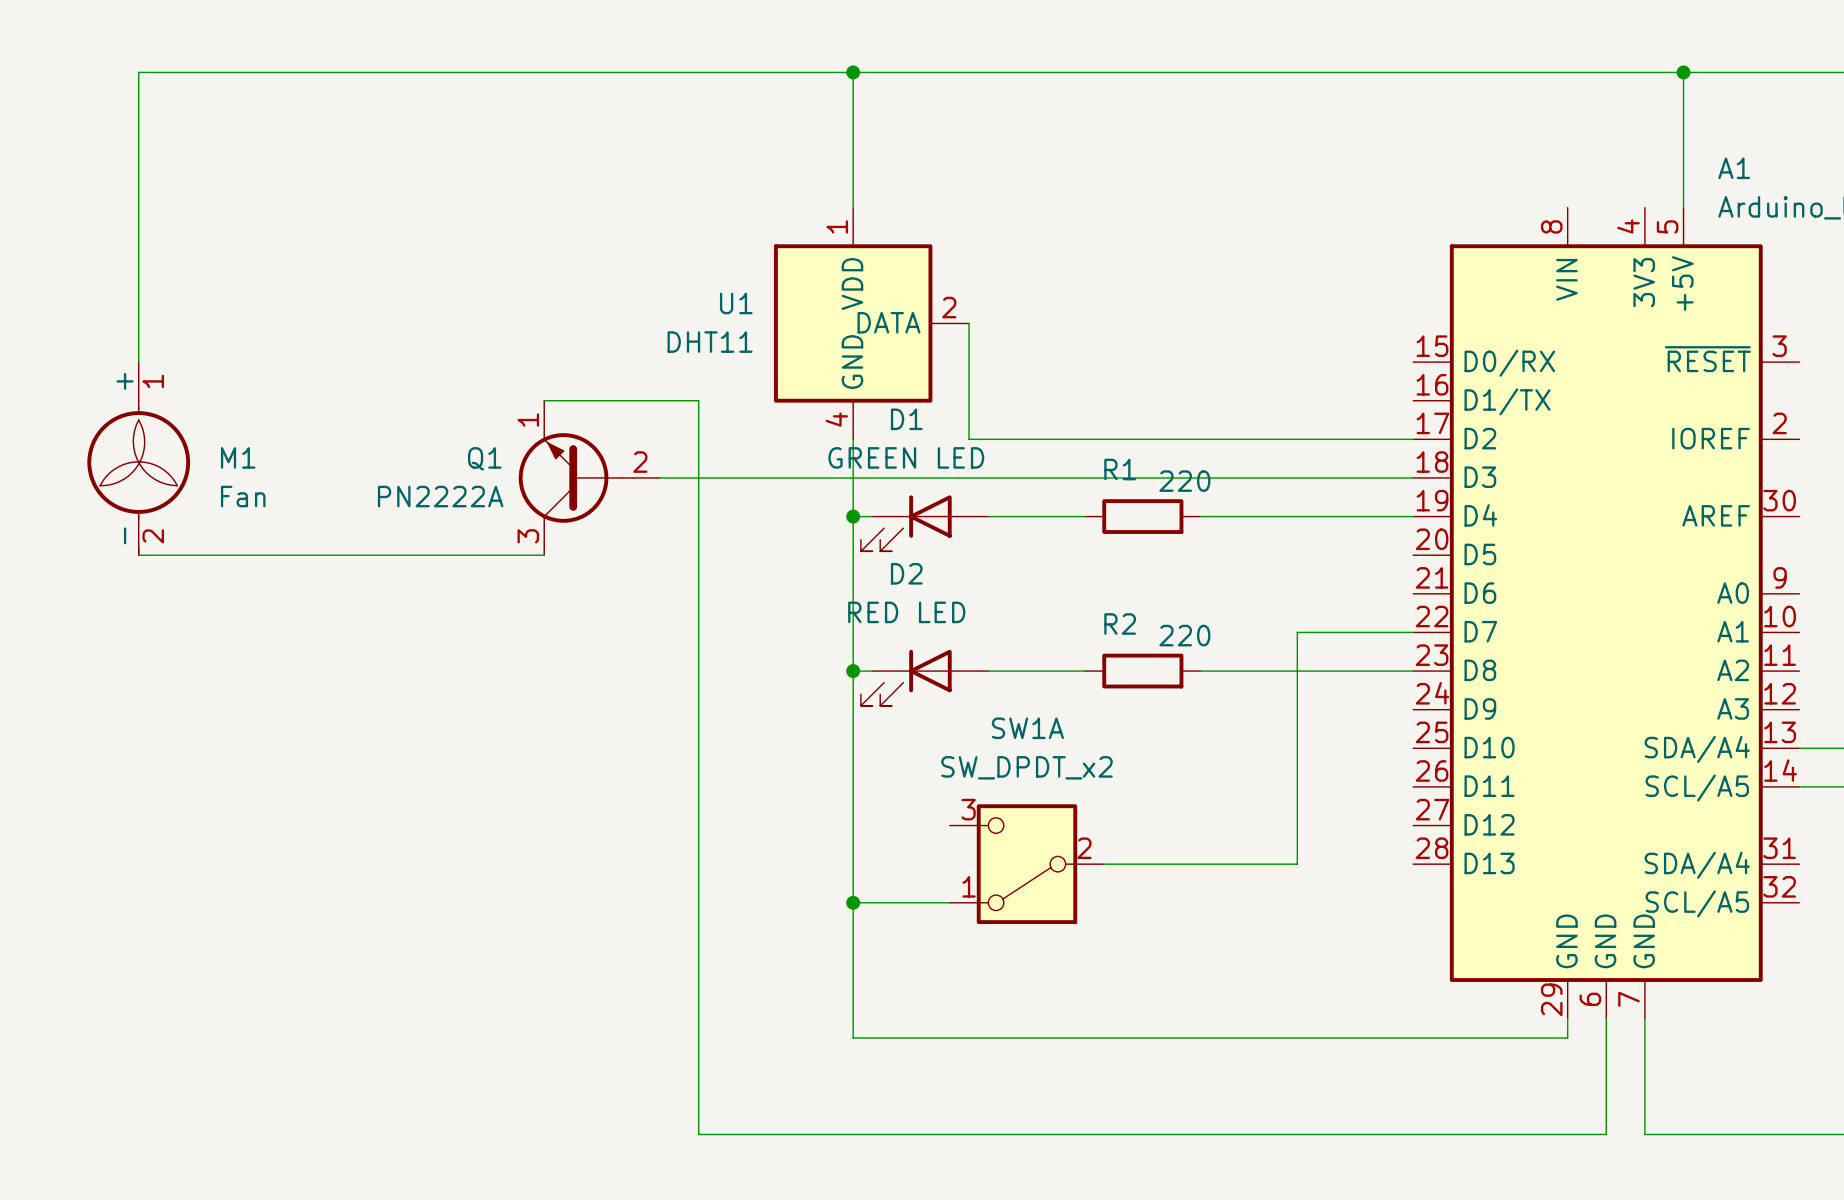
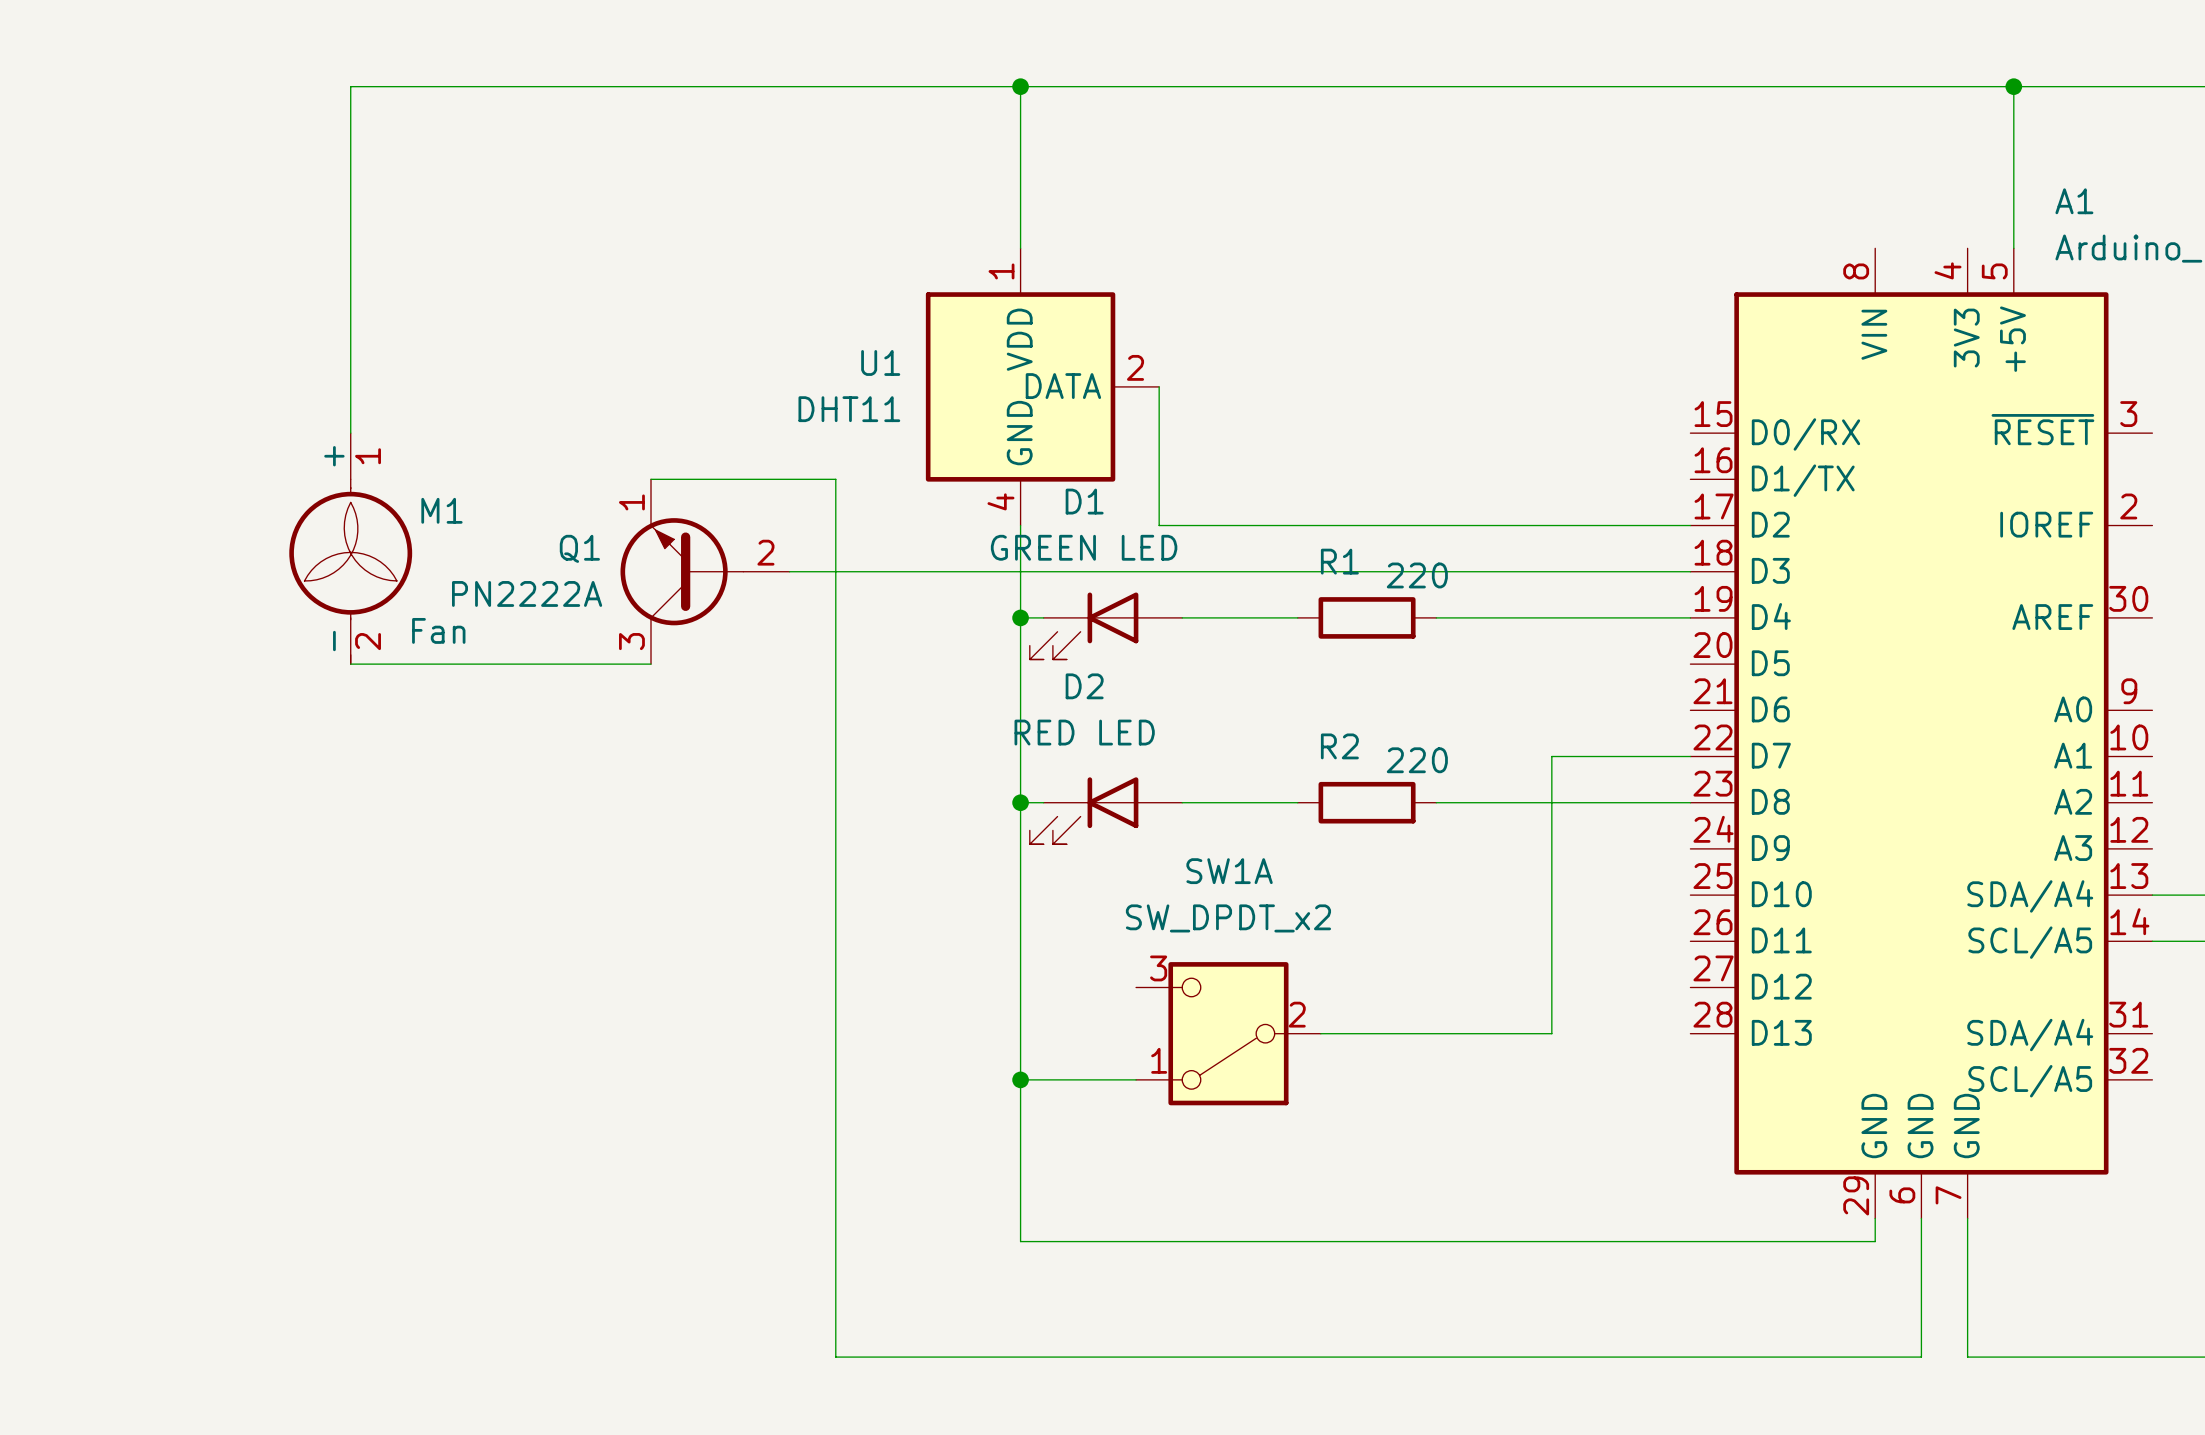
wire: (293, 72) (138, 72) (138, 362) -> (350, 86) (350, 433)
M1 name position: M1 (238, 457) -> M1 (441, 510)
M1 position: (138, 458) -> (350, 548)
M1 value position: Fan (243, 496) -> Fan (438, 630)
wire: (138, 555) (293, 555) -> none

